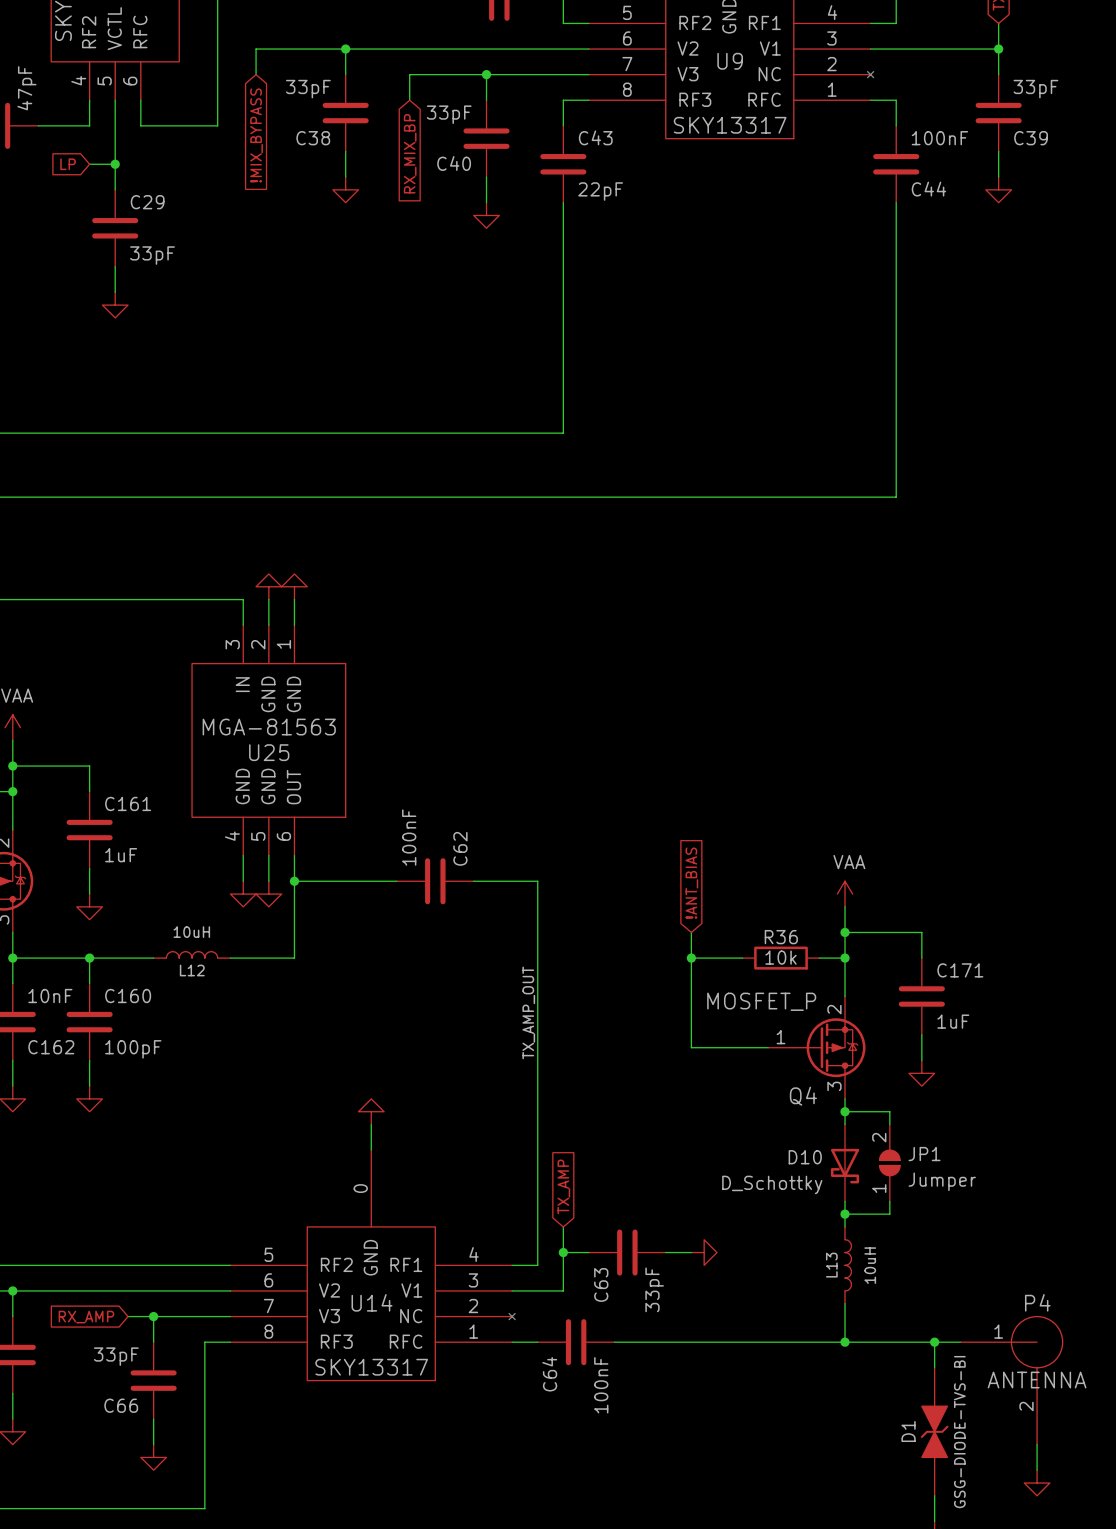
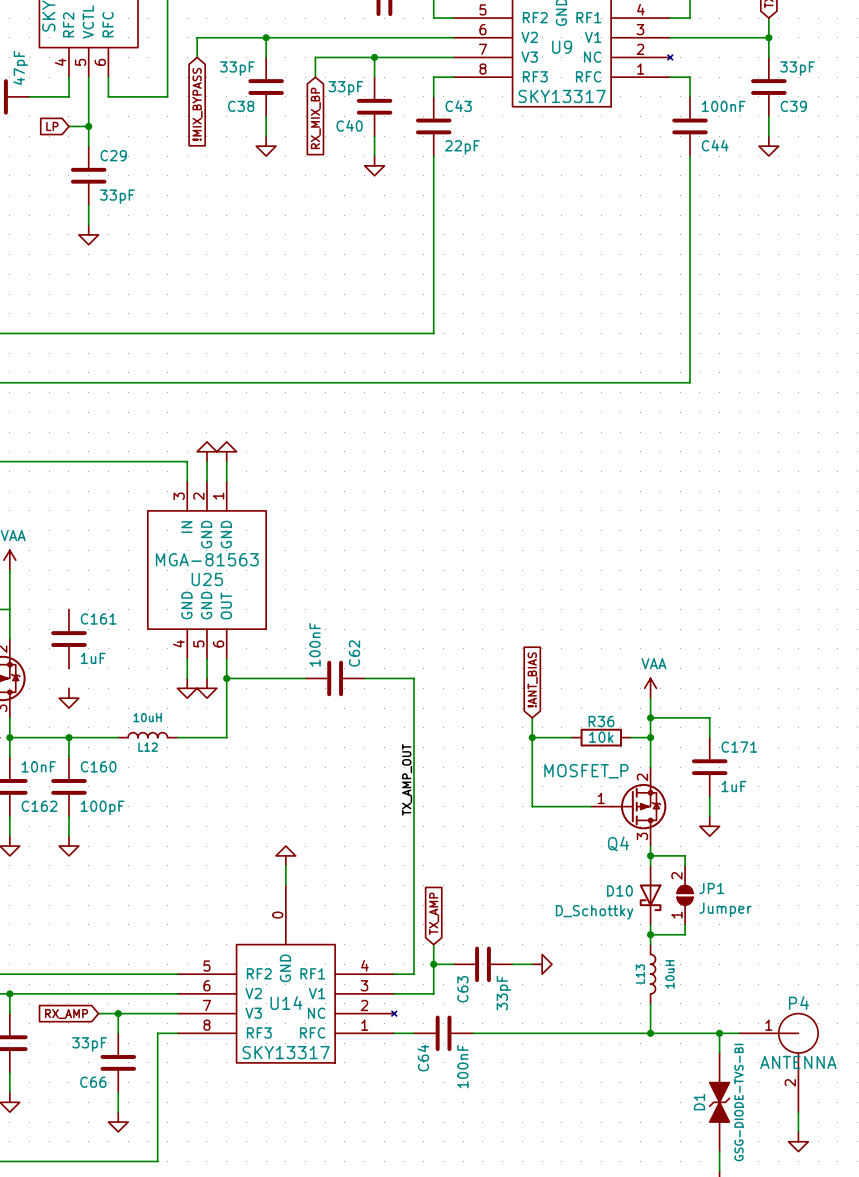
wire: (12, 766) (89, 766) (89, 791) -> none
junction: (12, 766) -> none
junction: (12, 791) -> none
wire: (89, 868) (89, 894) -> none

